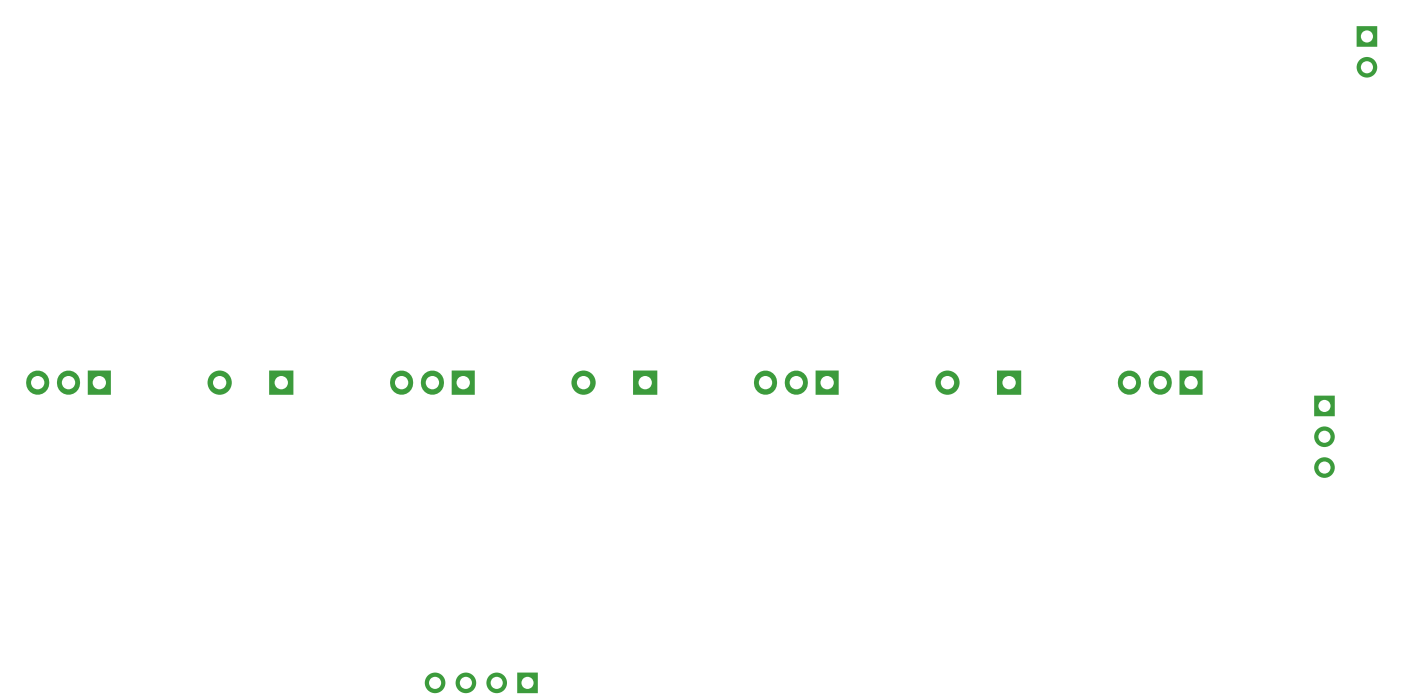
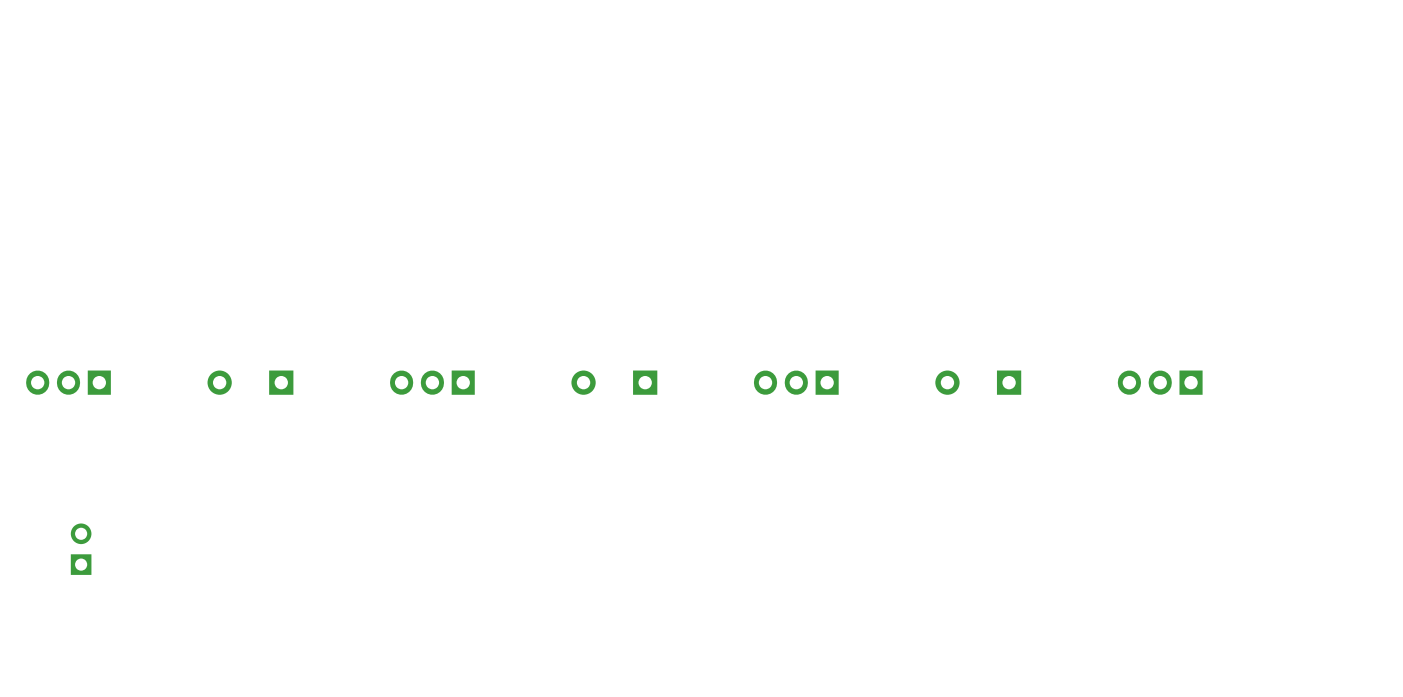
part: (1366, 51) -> none
part: (1324, 436) -> none
part: none -> (81, 549)
part: (481, 682) -> none

